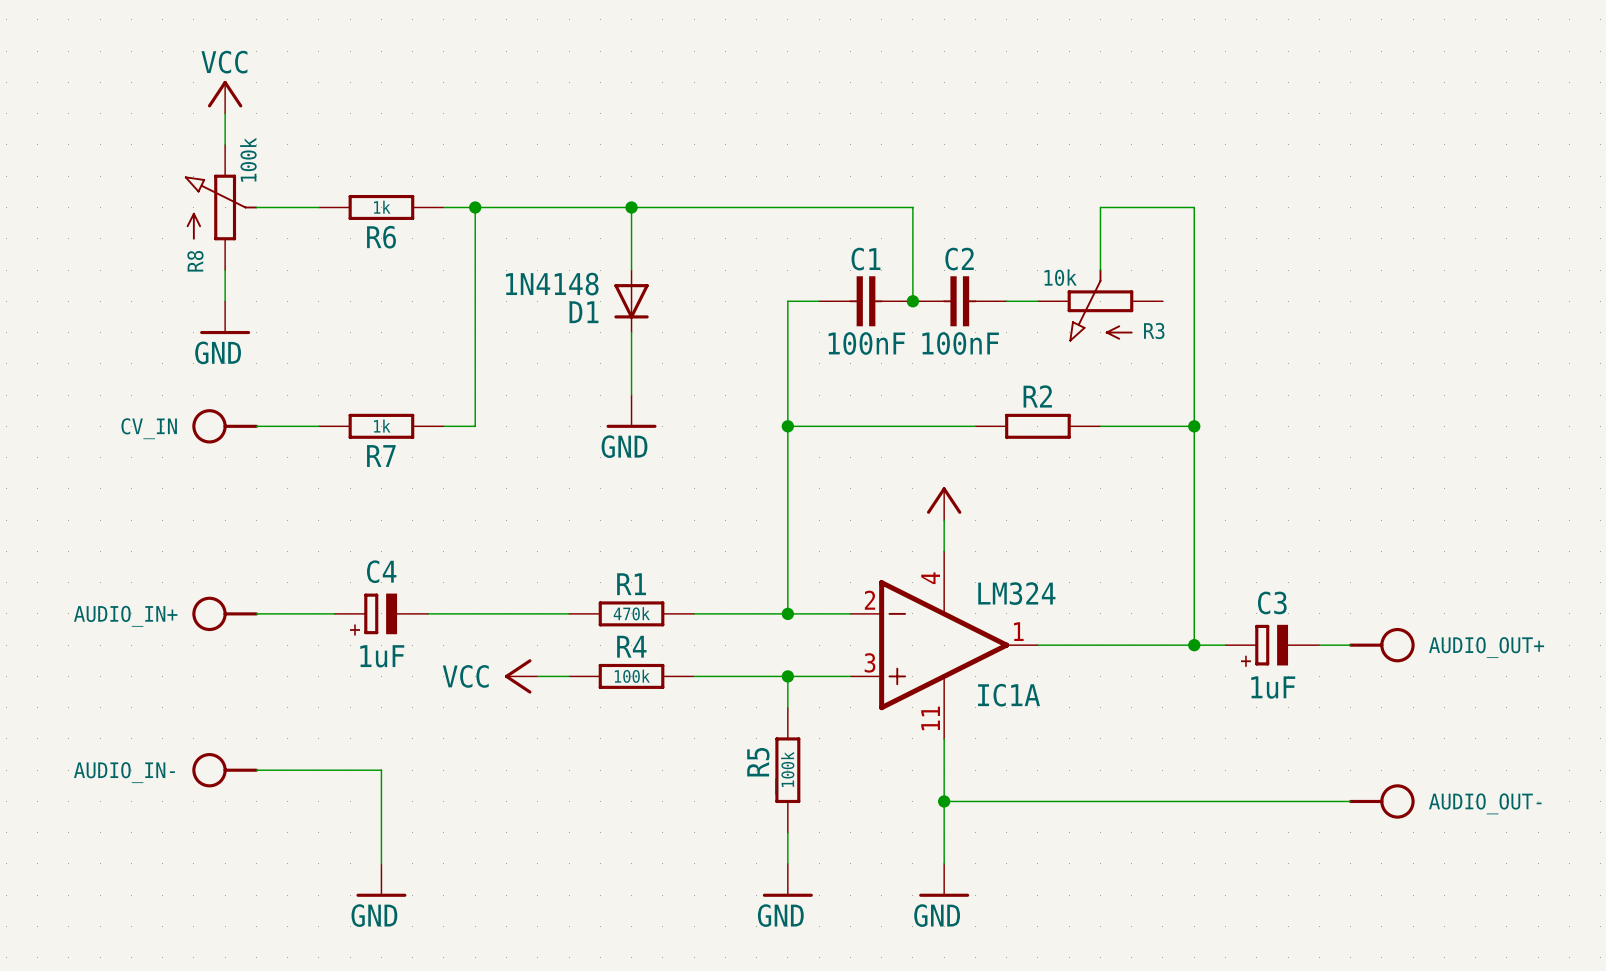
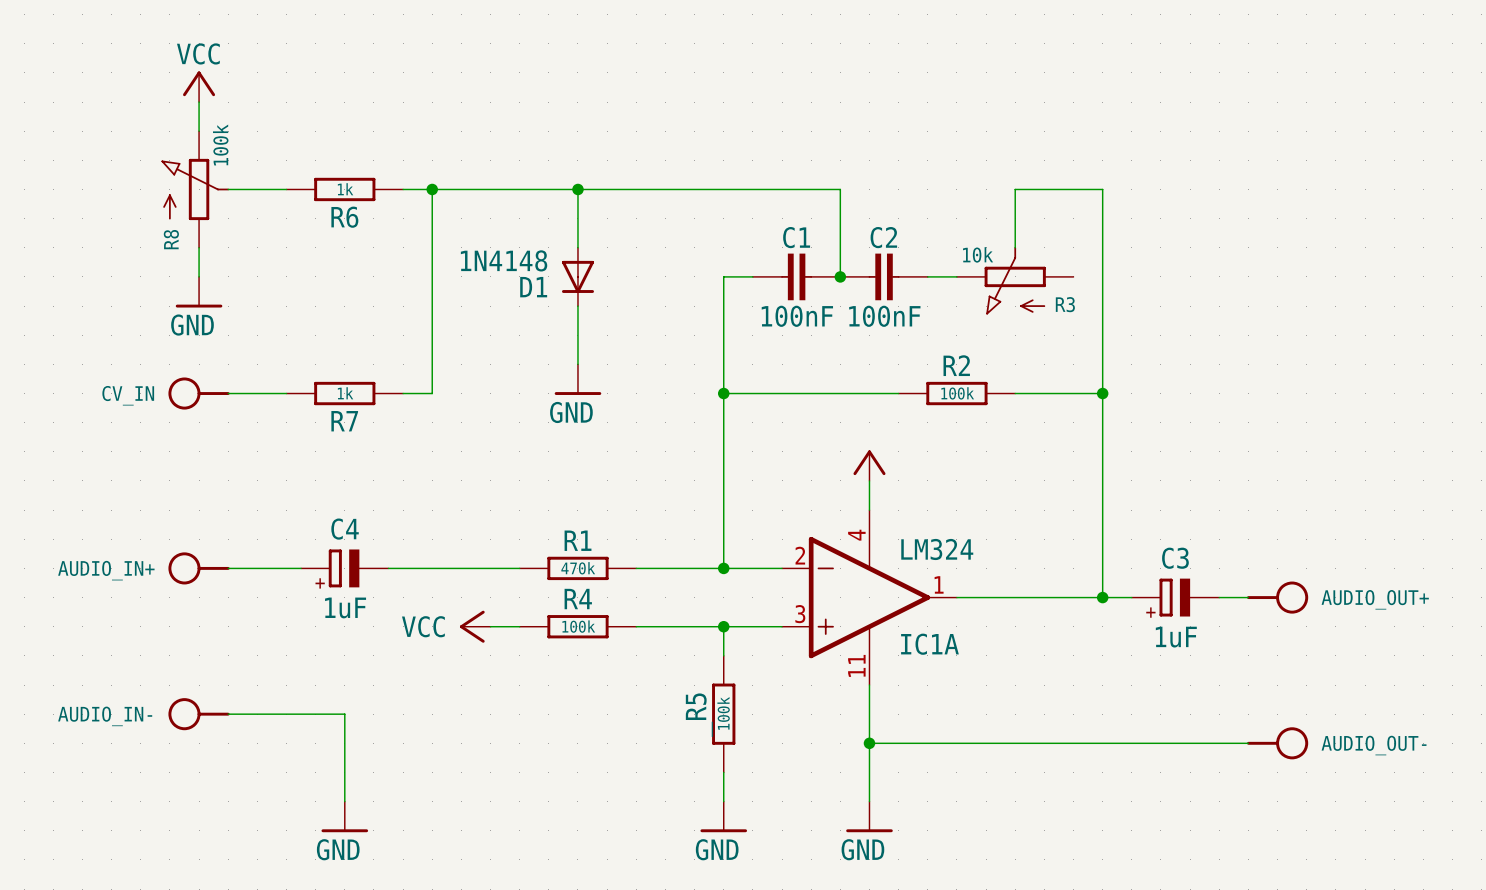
R2 value: none -> 100k (957, 393)

